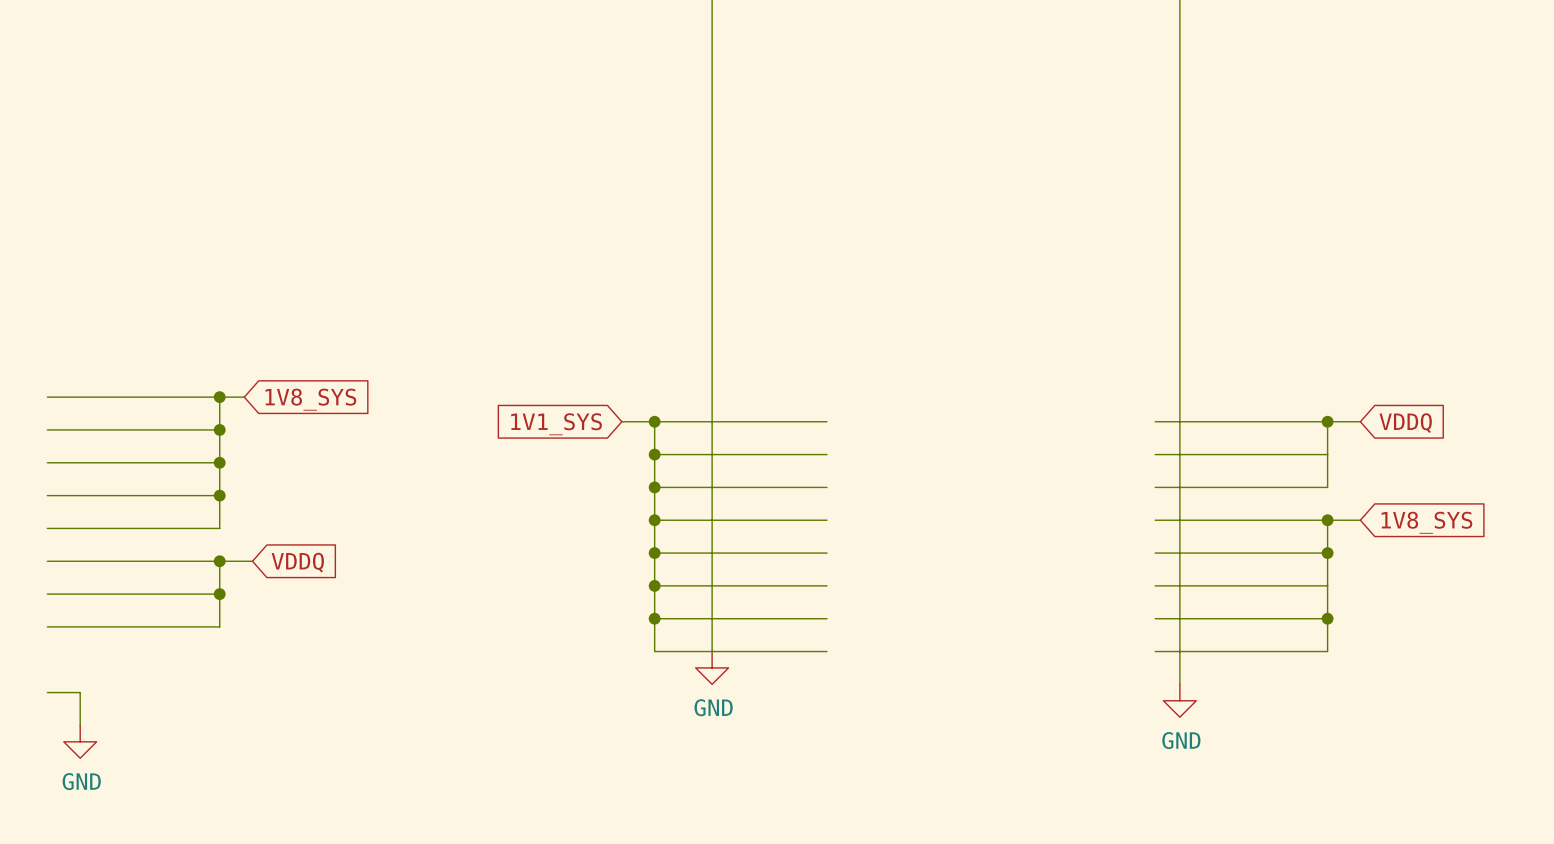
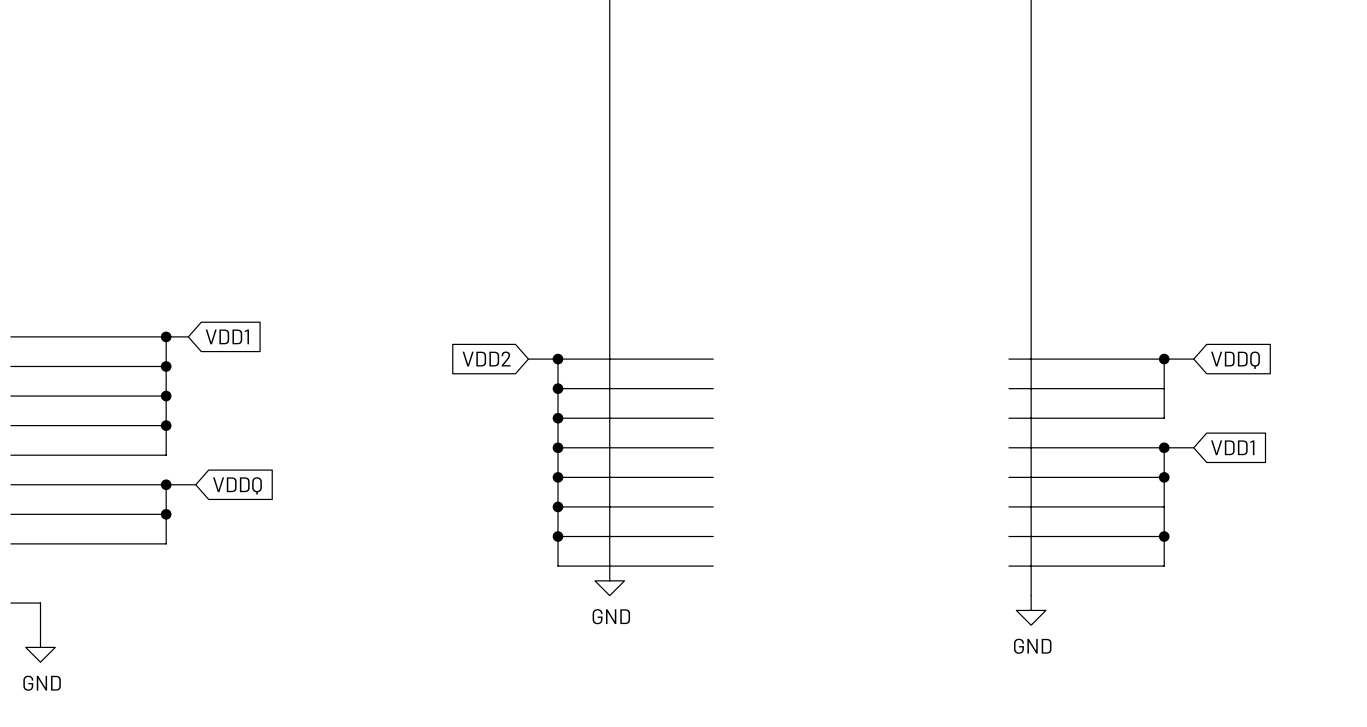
global label: 1V8_SYS (310, 399) -> VDD1 (227, 336)
global label: 1V1_SYS (556, 424) -> VDD2 (486, 358)
global label: 1V8_SYS (1426, 522) -> VDD1 (1232, 447)

